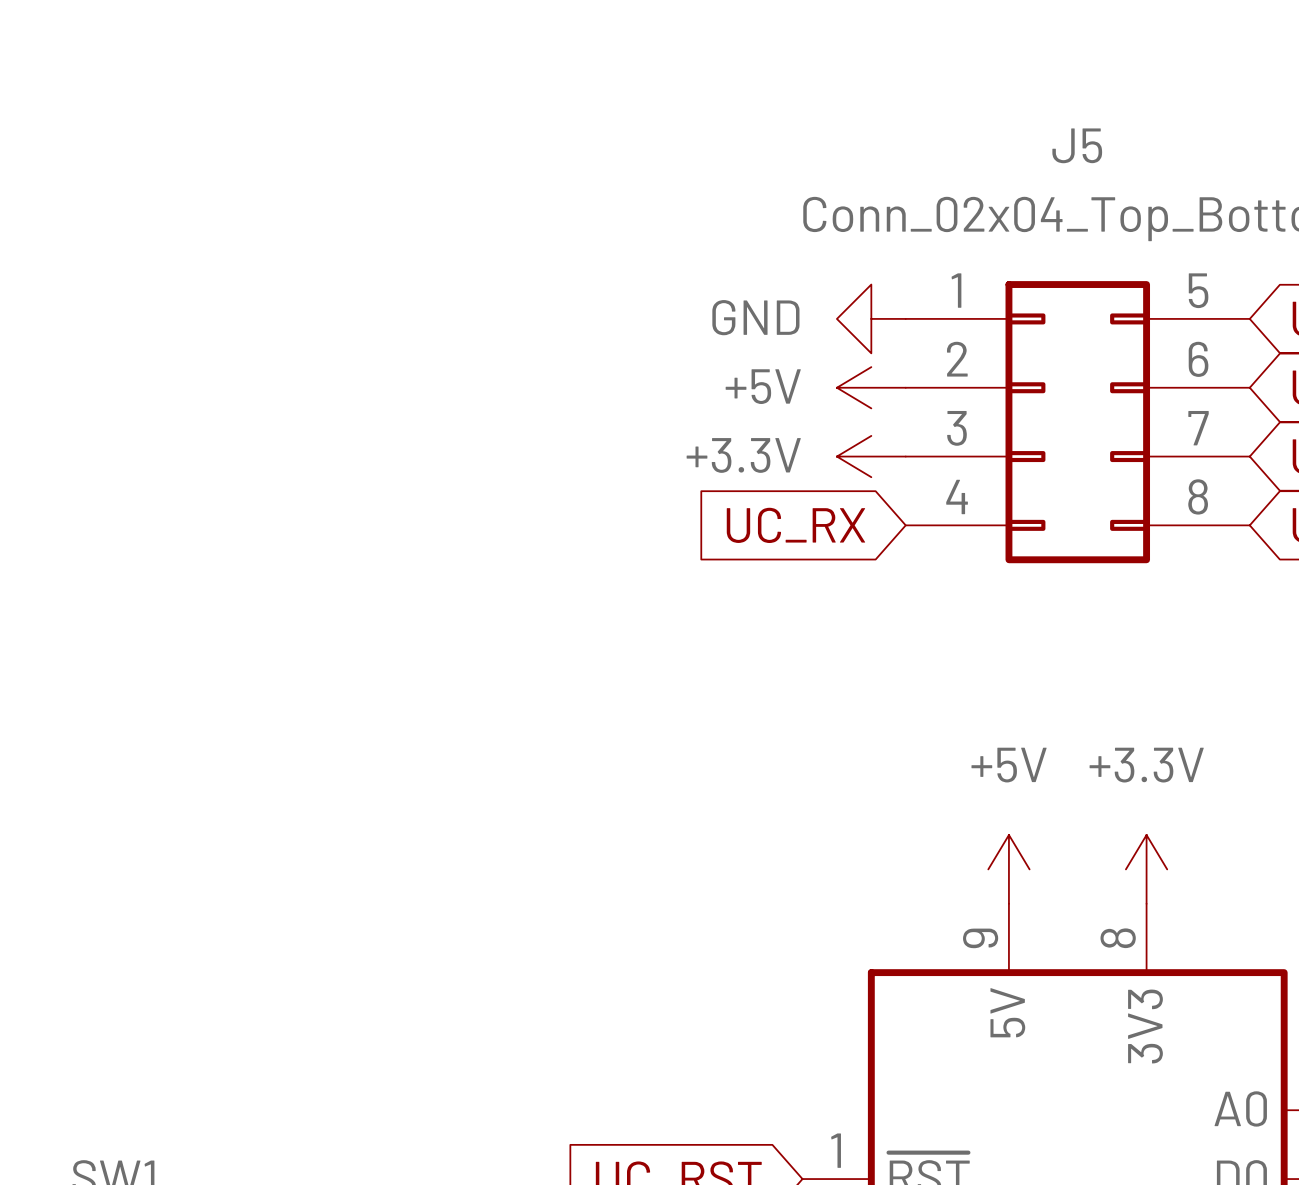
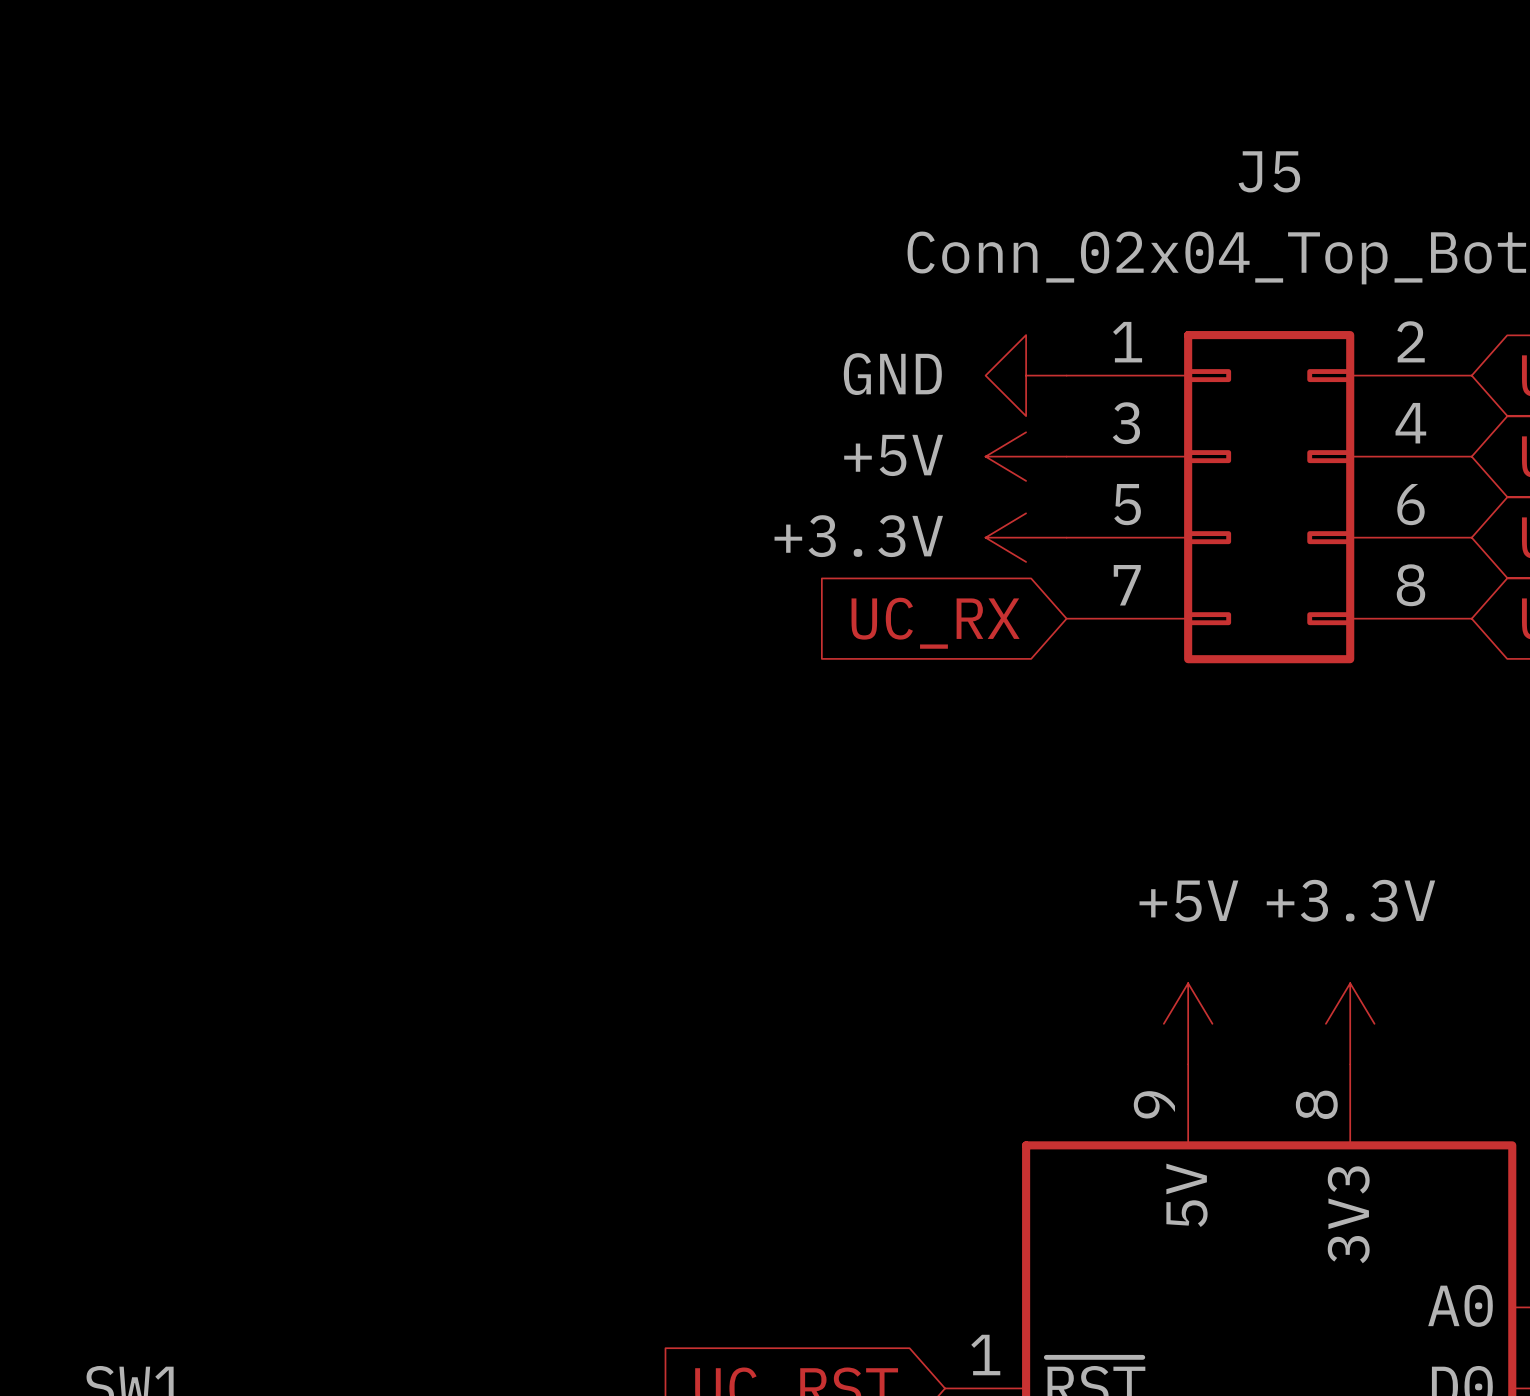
J5 pin number: 5 (1198, 290) -> 2 (1411, 341)
J5 pin number: 2 (957, 359) -> 3 (1126, 423)
J5 pin number: 6 (1198, 359) -> 4 (1410, 423)
J5 pin number: 3 (956, 428) -> 5 (1127, 504)
J5 pin number: 7 (1198, 428) -> 6 (1410, 504)
J5 pin number: 4 (957, 496) -> 7 (1127, 585)

